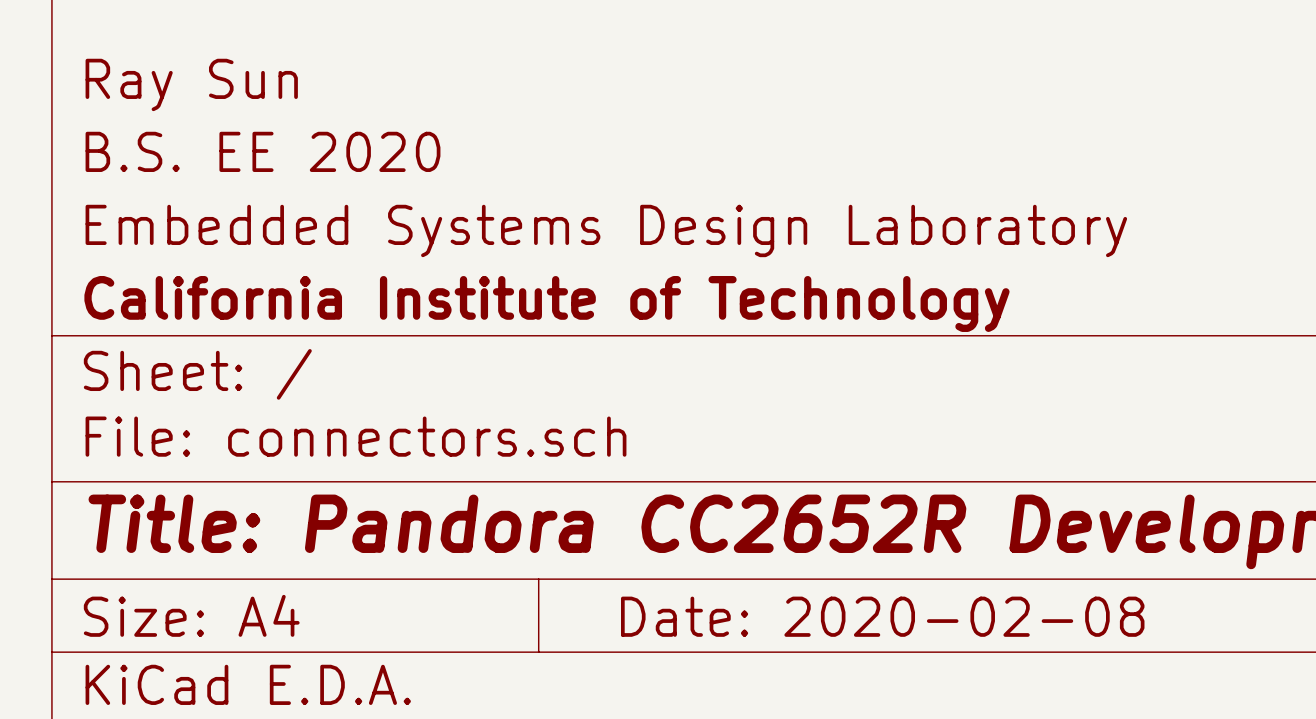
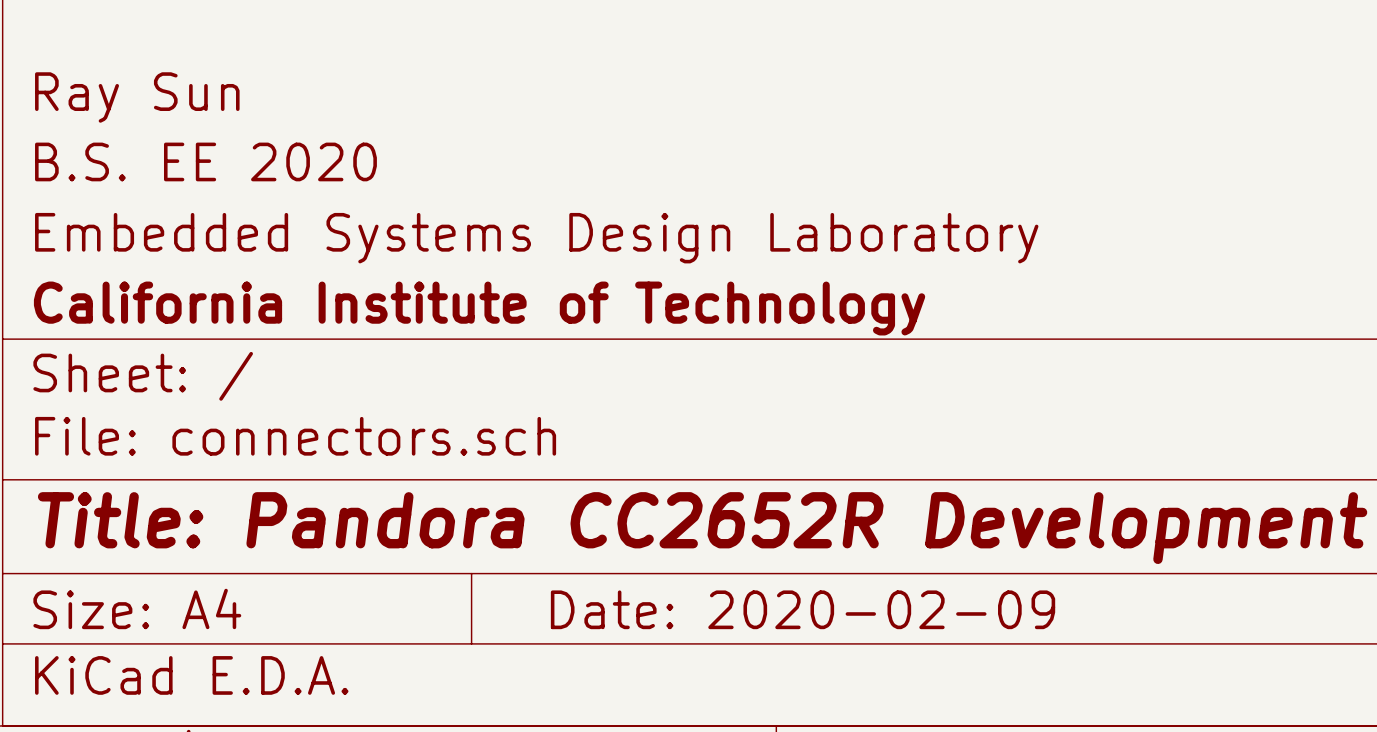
title block: Date: 2020-02-08 (882, 616) -> Date: 2020-02-09 (803, 609)

